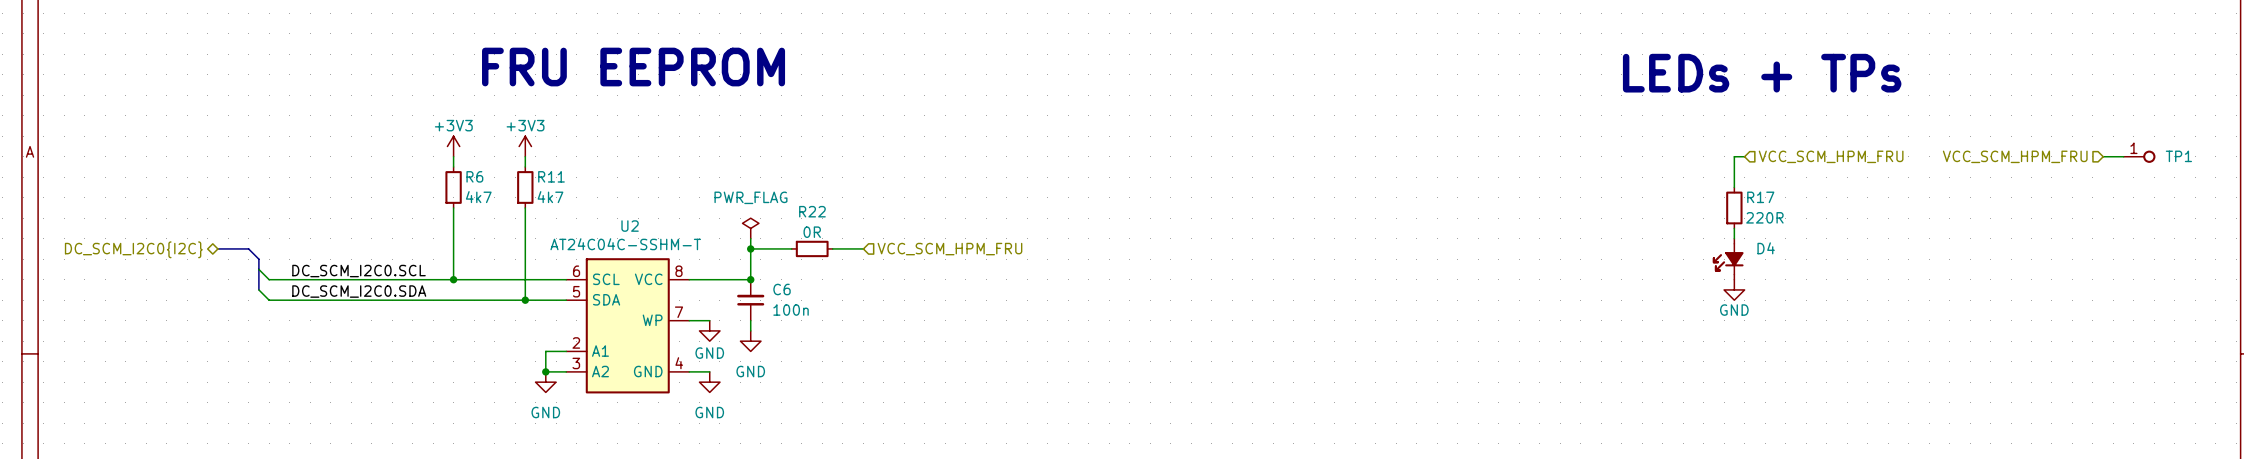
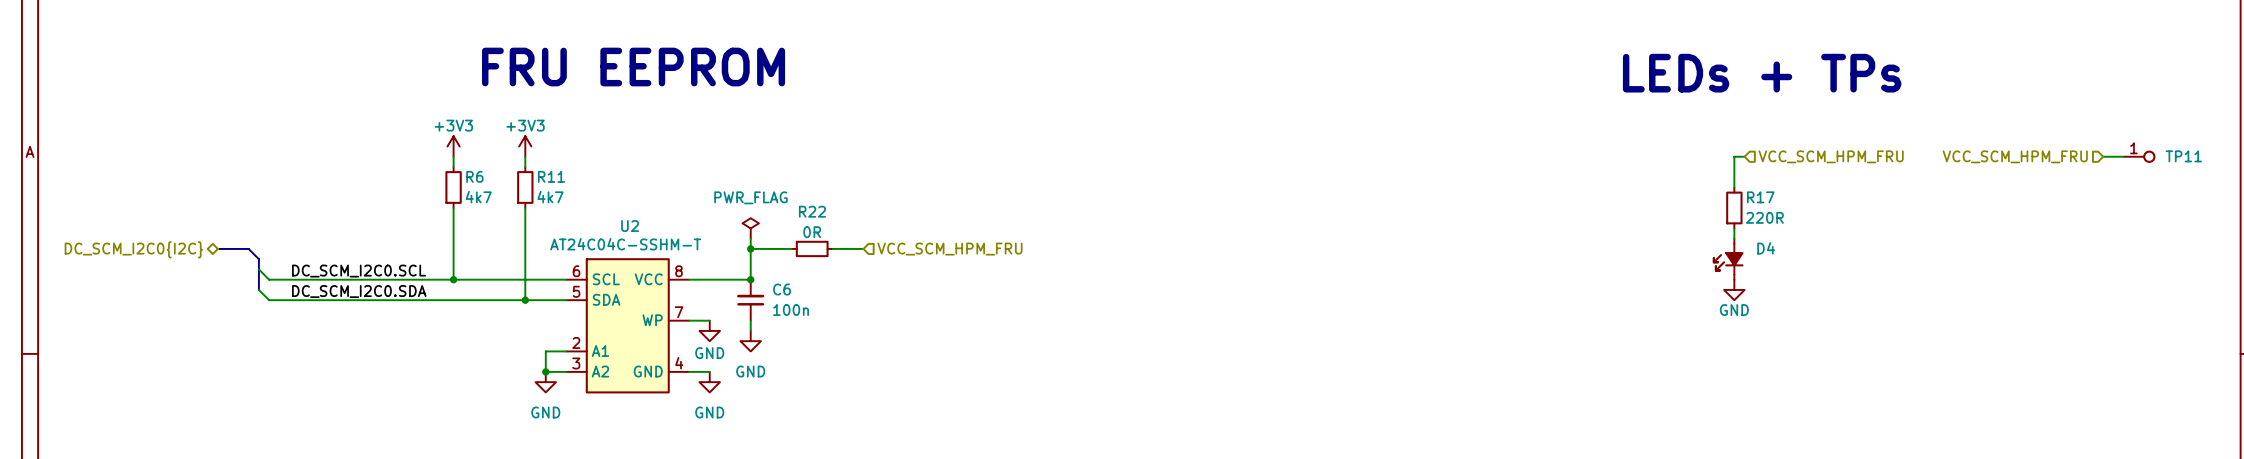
TP1 name: TP1 (2178, 156) -> TP11 (2183, 156)

